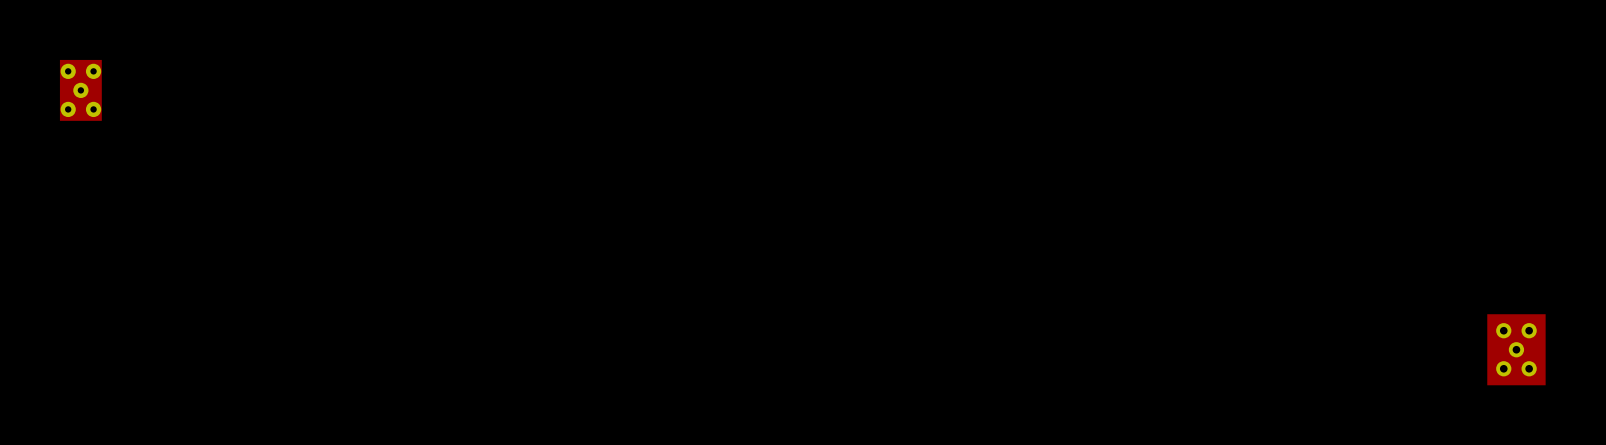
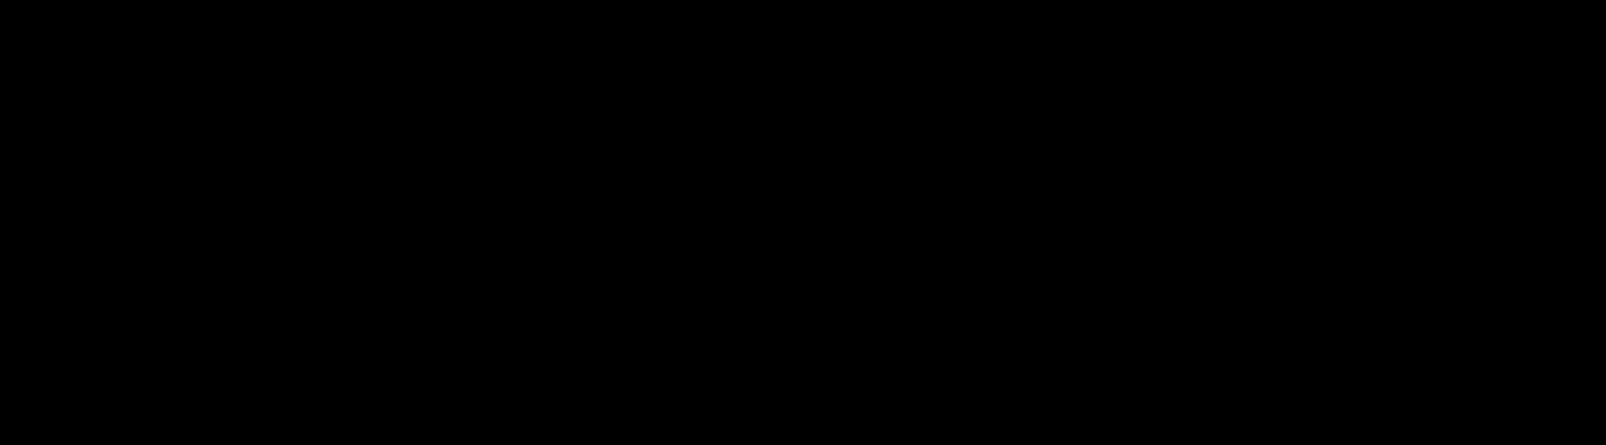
part: (80, 90) -> none
part: (1516, 349) -> none

